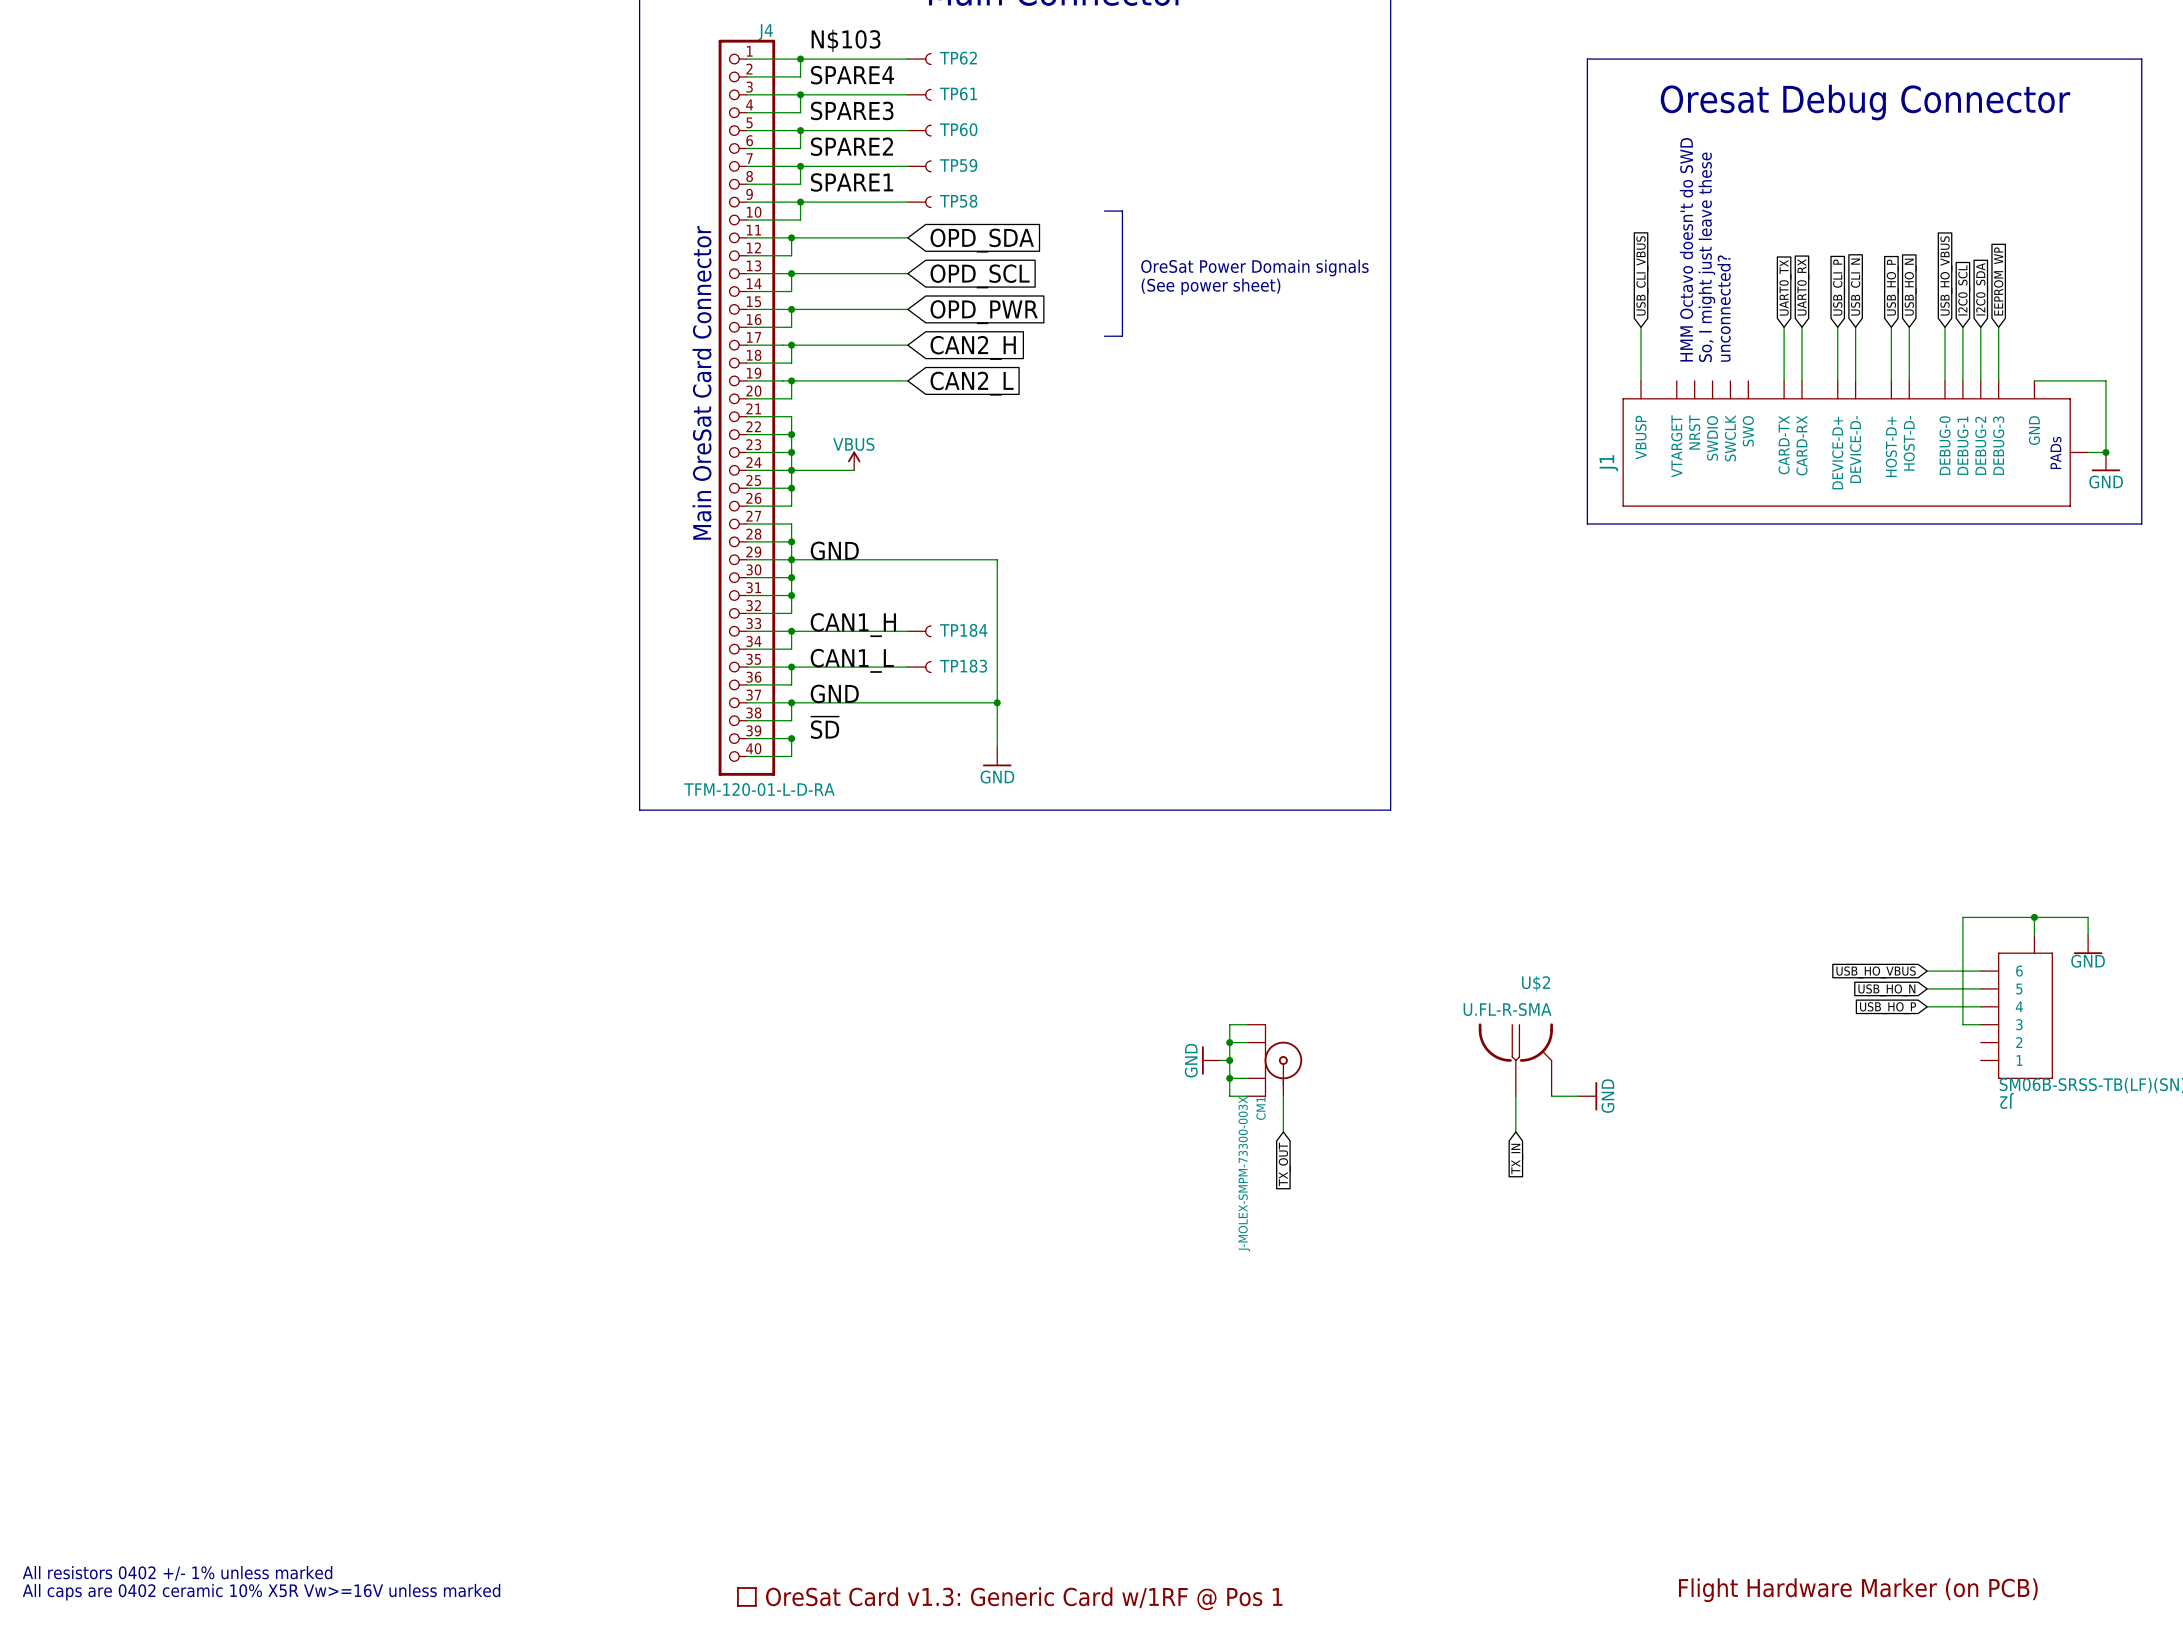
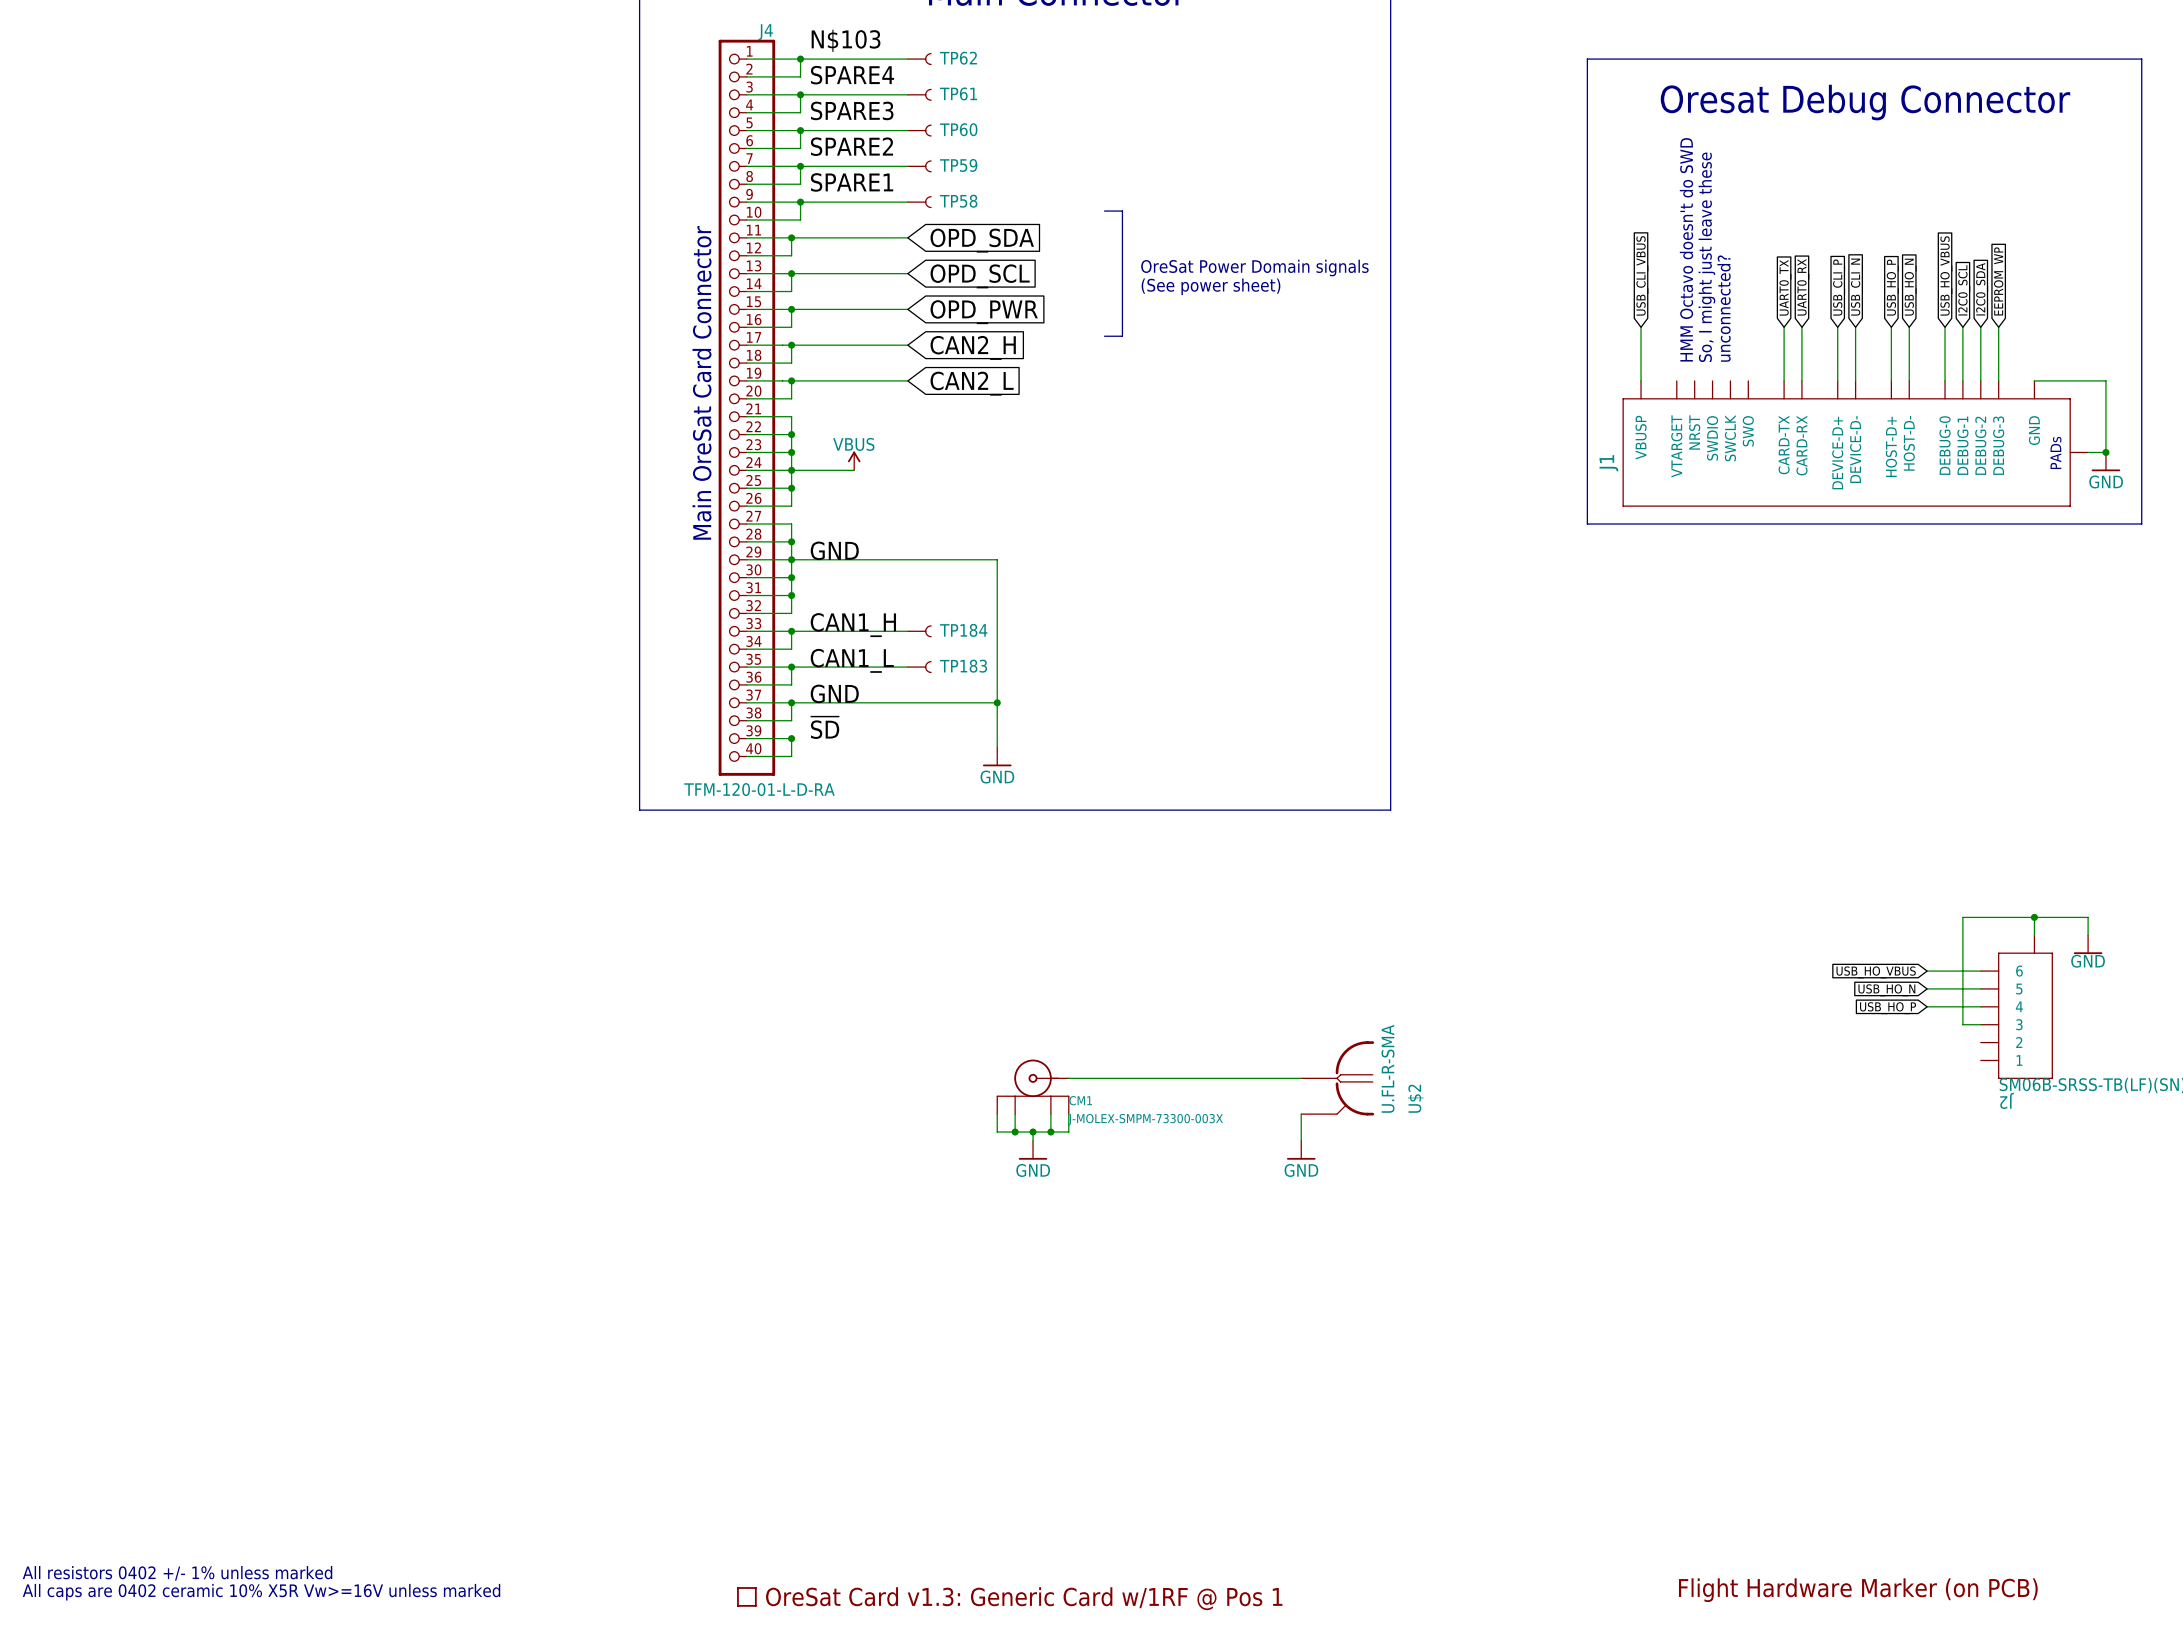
wire: (1247, 1024) (1229, 1024) (1229, 1096) (1247, 1096) -> none
wire: (1229, 1042) (1247, 1042) -> none
junction: (1229, 1042) -> none
U$2 rotation: 0° (1515, 1042) -> 90° clockwise (1354, 1078)
U$2 position: (1515, 1059) -> (1337, 1078)
power symbol: GND (1211, 1060) -> none
wire: (1220, 1060) (1229, 1060) -> none
junction: (1229, 1060) -> none
CM1 position: (1274, 1060) -> (1033, 1086)
CM1 rotation: 0° (1283, 1060) -> 90° counterclockwise (1033, 1078)
wire: none -> (1068, 1078) (1229, 1078)
junction: (1229, 1078) -> none
wire: (1283, 1096) (1283, 1132) -> none
wire: (1515, 1096) (1515, 1132) -> none
wire: (1551, 1096) (1578, 1096) -> none
power symbol: GND (1587, 1096) -> none
wire: none -> (997, 1114) (997, 1132) (1068, 1132) (1068, 1114)
wire: none -> (1015, 1114) (1015, 1132)
wire: none -> (1050, 1114) (1050, 1132)
wire: none -> (1301, 1114) (1301, 1140)
junction: none -> (1015, 1132)
wire: none -> (1033, 1132) (1033, 1140)
junction: none -> (1033, 1132)
junction: none -> (1050, 1132)
power symbol: none -> GND (1033, 1150)
power symbol: none -> GND (1301, 1150)
global label: TX_IN (1517, 1158) -> none
global label: TX_OUT (1284, 1164) -> none

